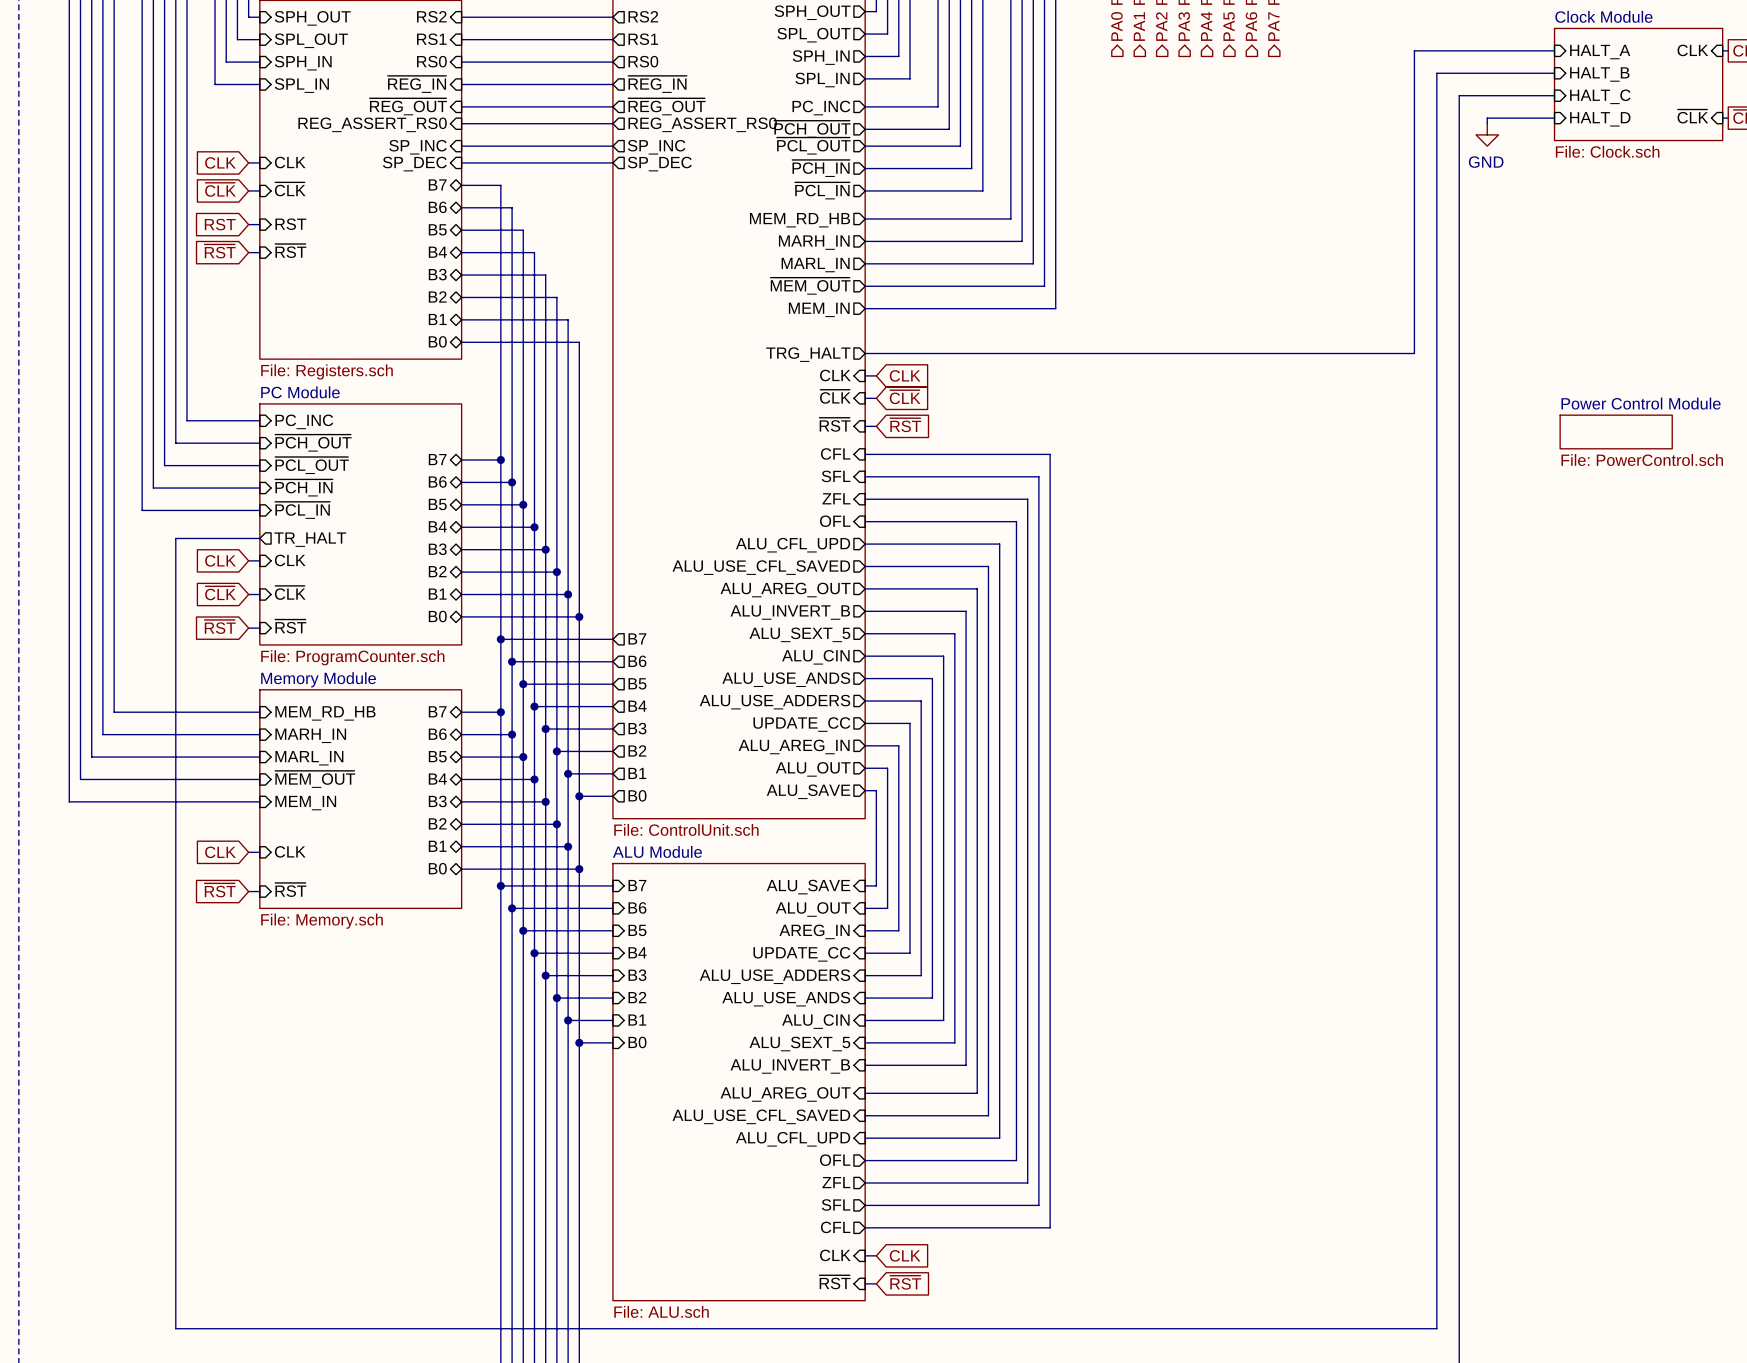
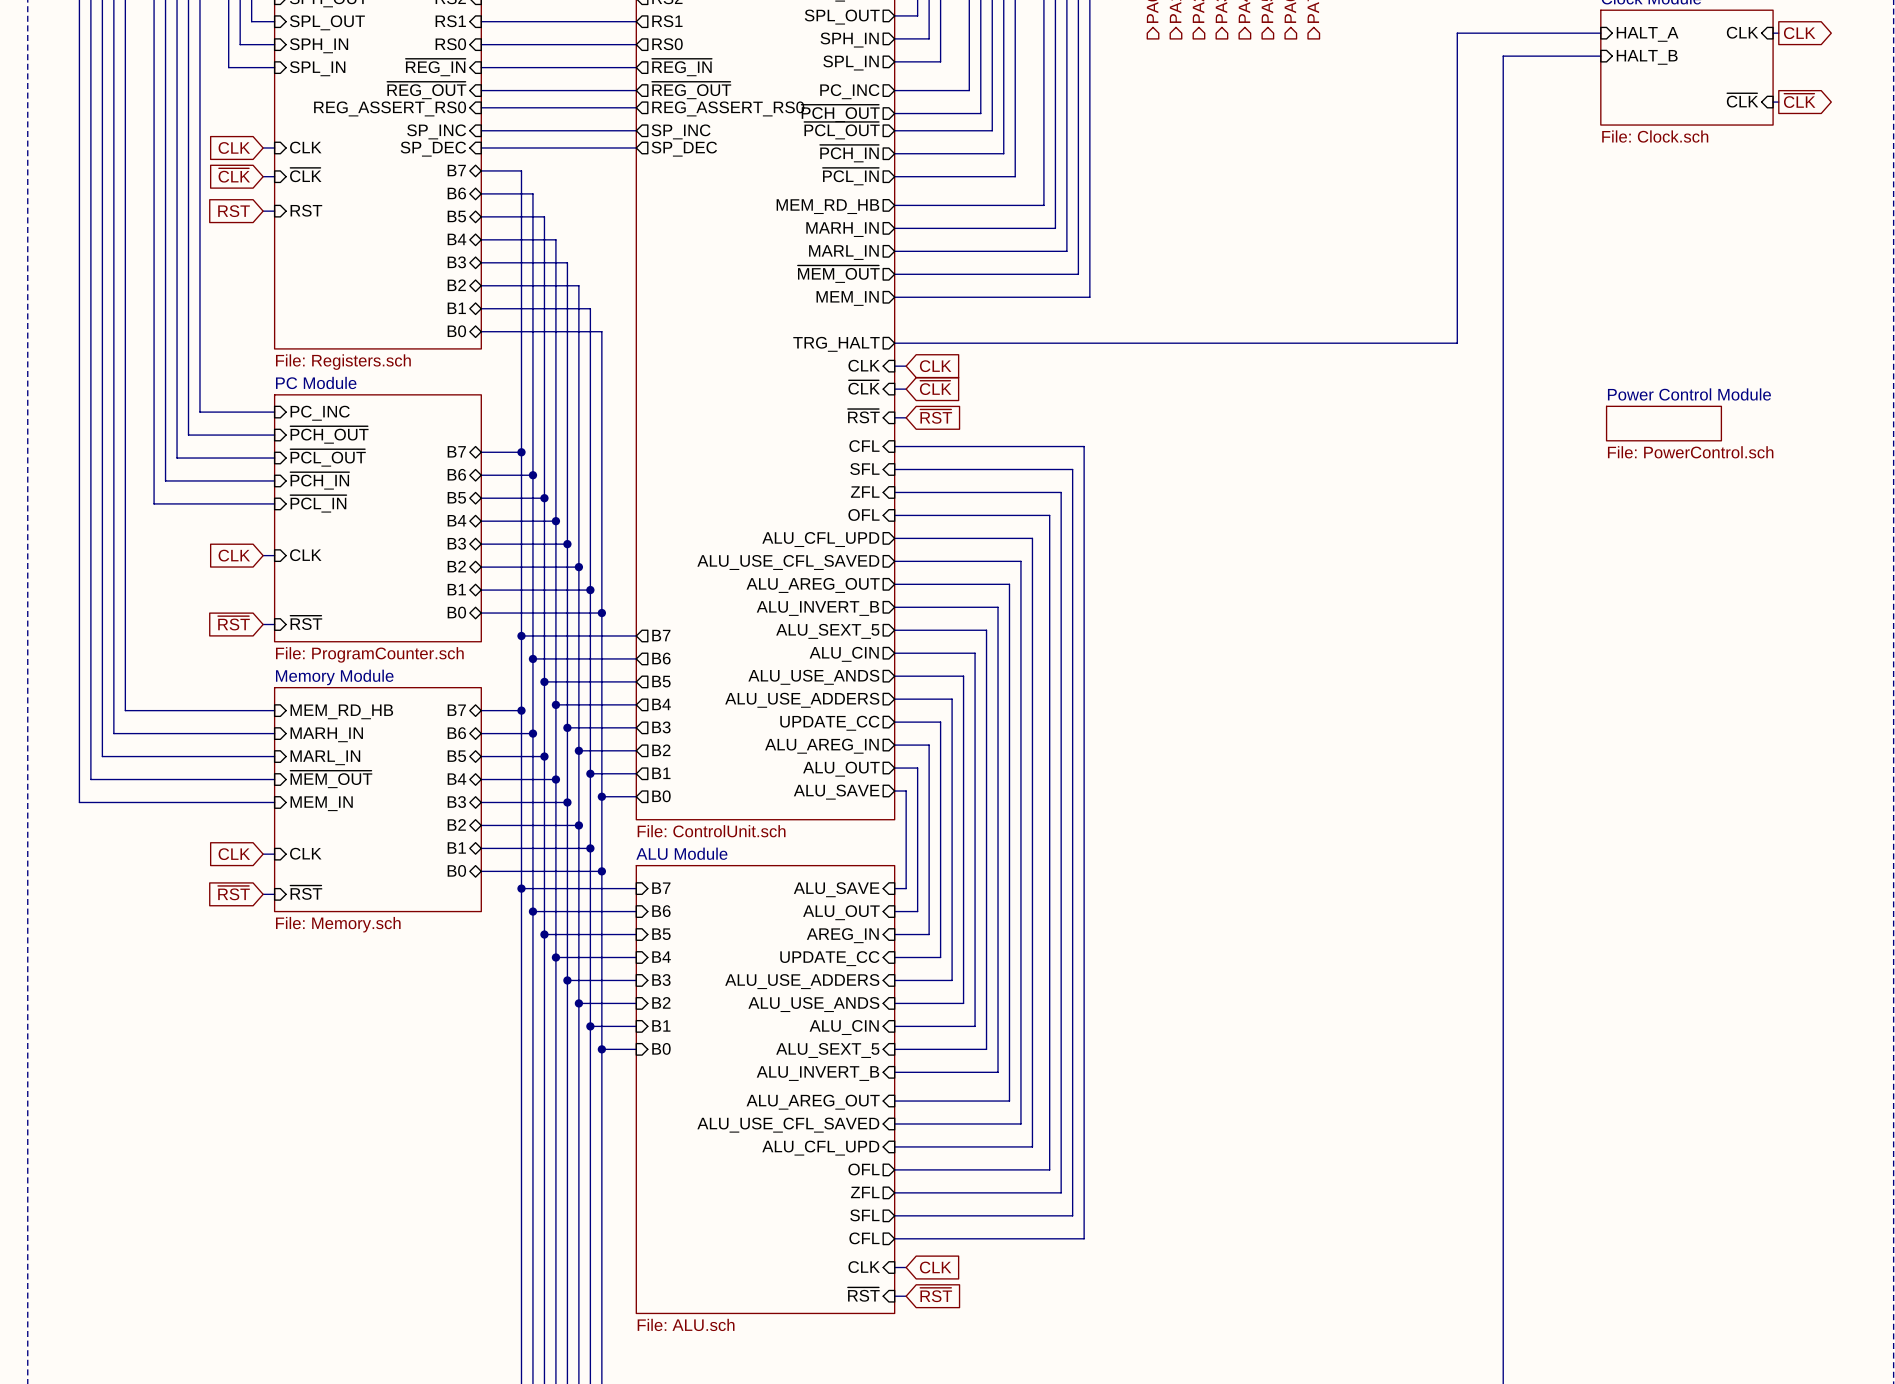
wire: (1459, 73) (1436, 73) (1436, 1328) (175, 1328) (175, 538) (259, 538) -> none
wire: (1459, 95) (1554, 95) -> (1503, 79) (1503, 56)
sheet pin: HALT_C (1600, 96) -> none
wire: (1554, 118) (1487, 118) (1487, 123) -> none
sheet pin: HALT_D (1600, 119) -> none
power symbol: GND (1487, 134) -> none
global label: ~{RST} (220, 251) -> none
sheet pin: ~{RST} (290, 251) -> none
wire: (248, 252) (259, 252) -> none
sheet pin: TR_HALT (310, 539) -> none
sheet pin: ~{CLK} (290, 592) -> none
global label: ~{CLK} (220, 593) -> none
wire: (248, 594) (259, 594) -> none

